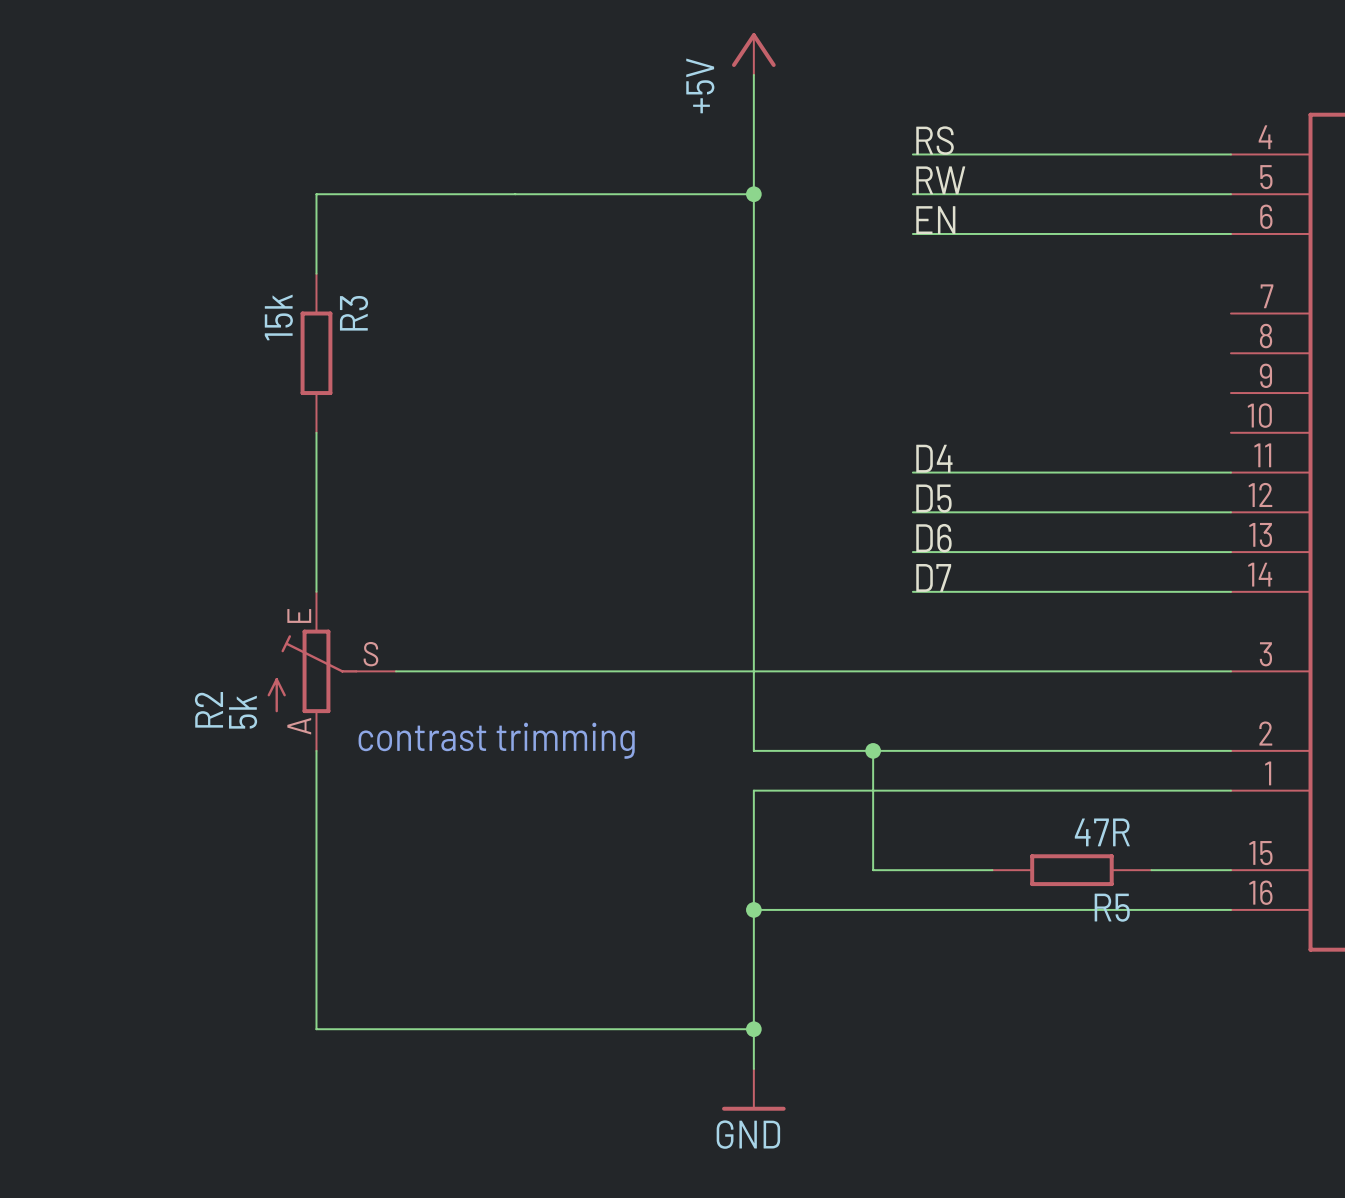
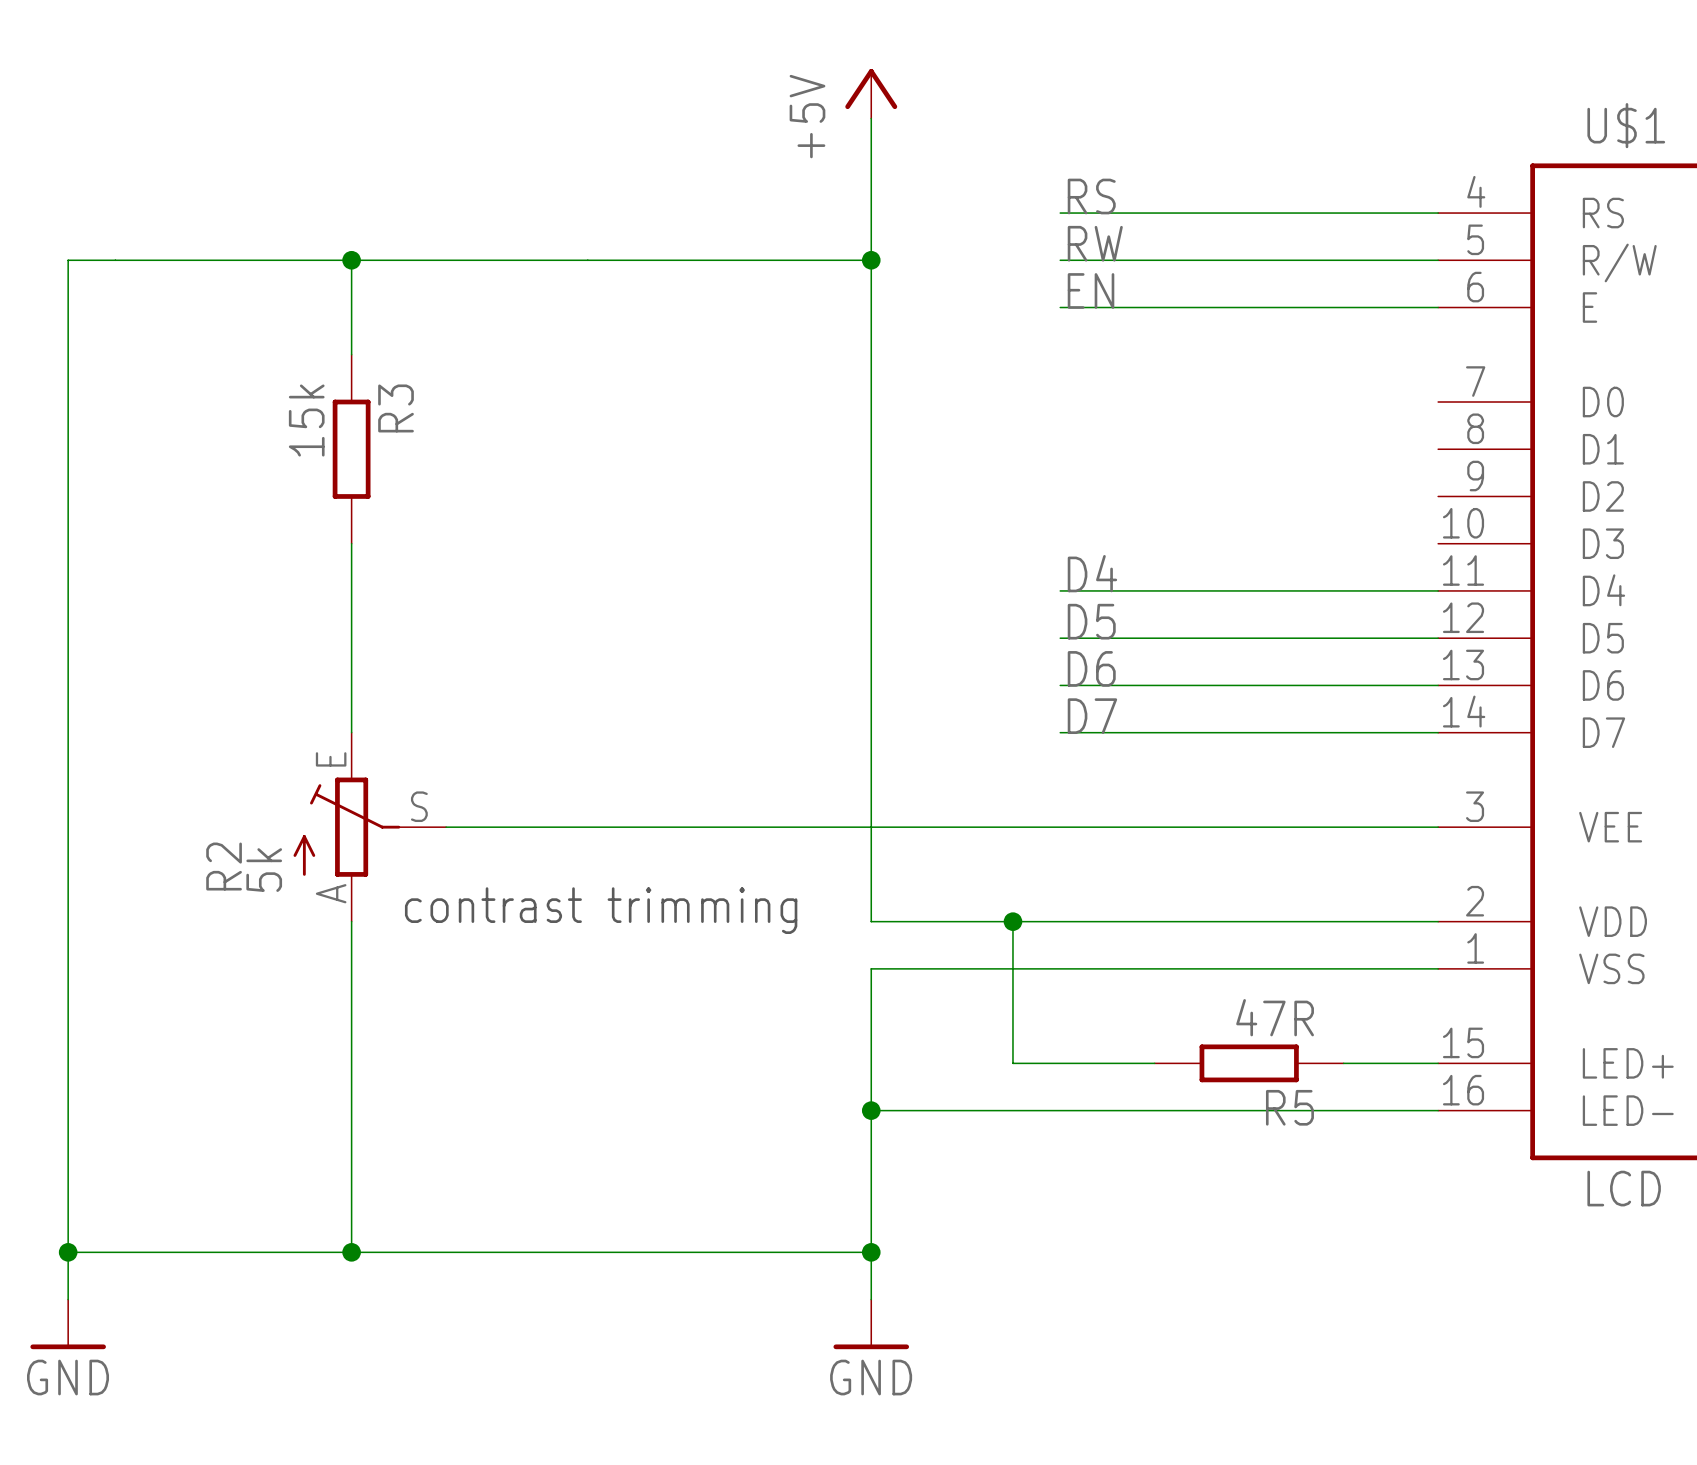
wire: none -> (351, 260) (68, 260) (68, 1299)
junction: none -> (351, 260)
wire: none -> (68, 1252) (351, 1252)
junction: none -> (68, 1252)
junction: none -> (351, 1252)
power symbol: none -> GND (68, 1324)

